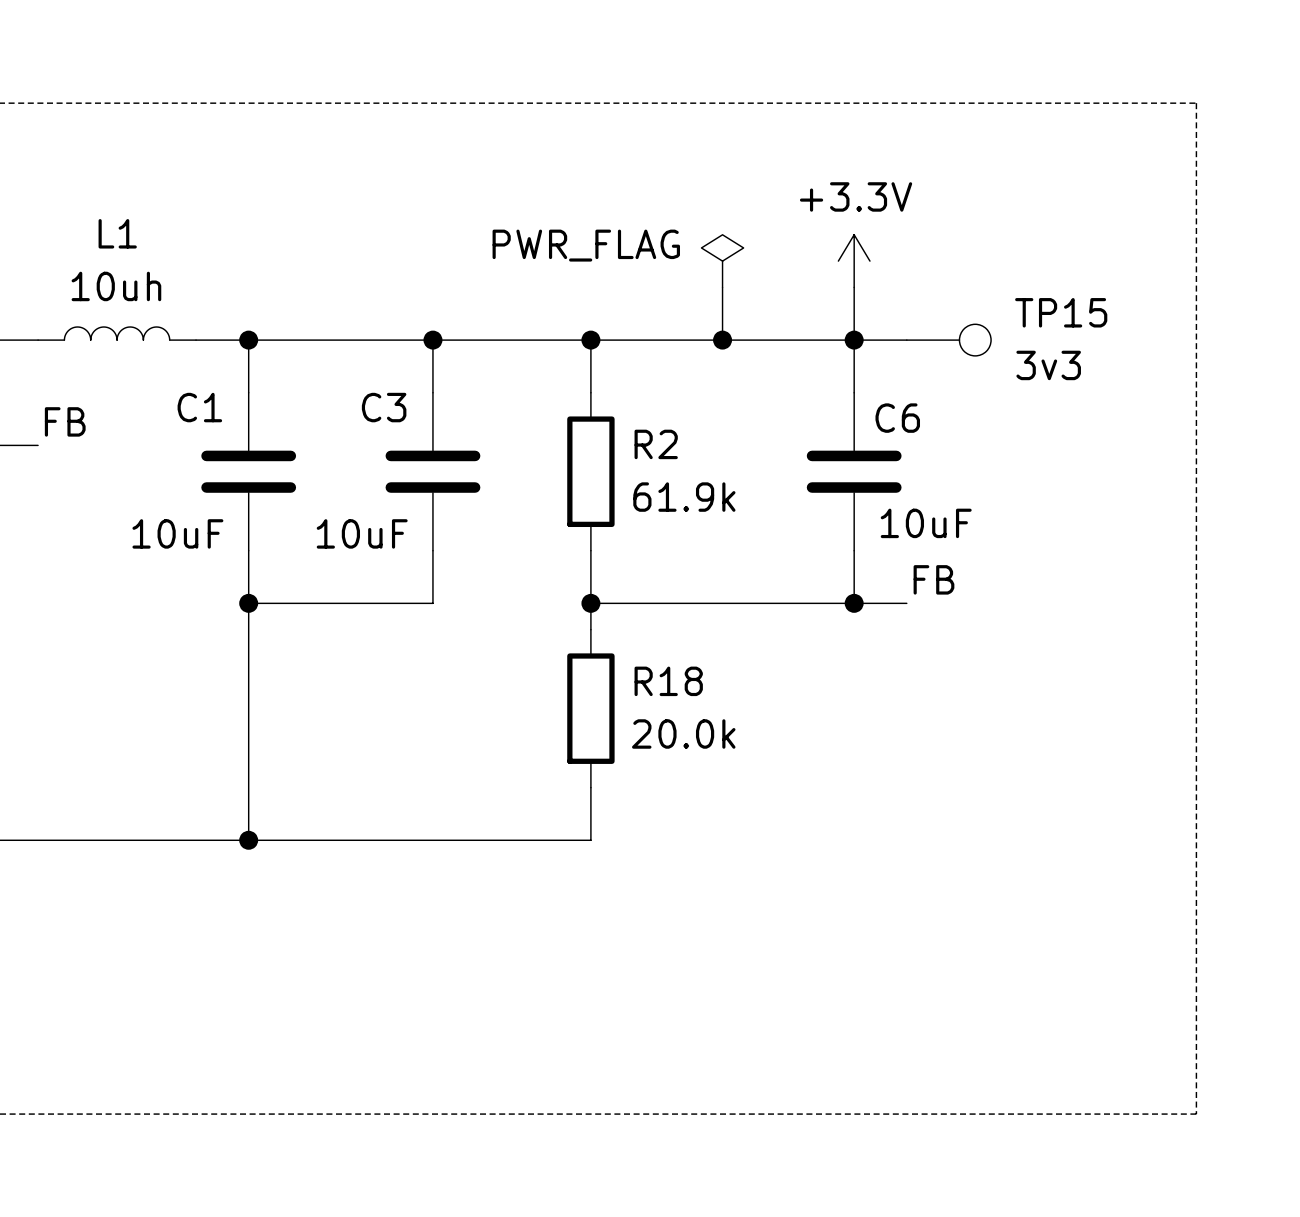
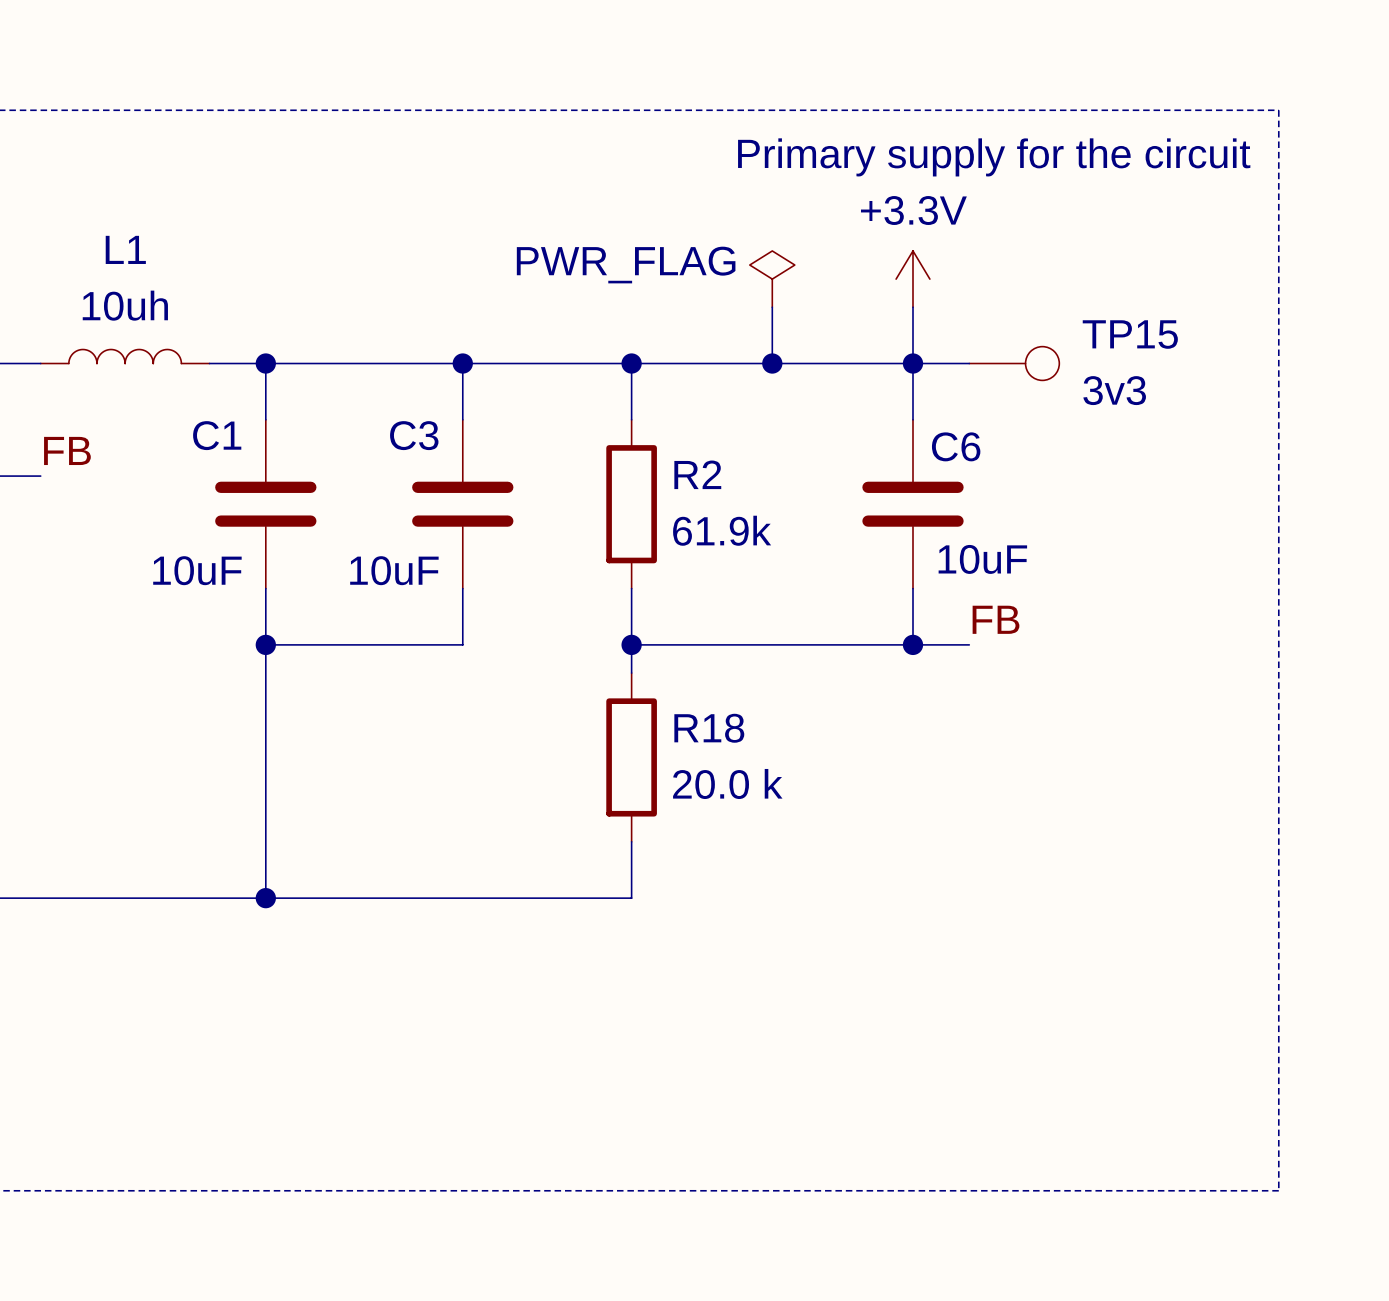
text: none -> Primary supply for the circuit (994, 157)
R18 value: 20.0k (683, 733) -> 20.0 k (727, 783)

